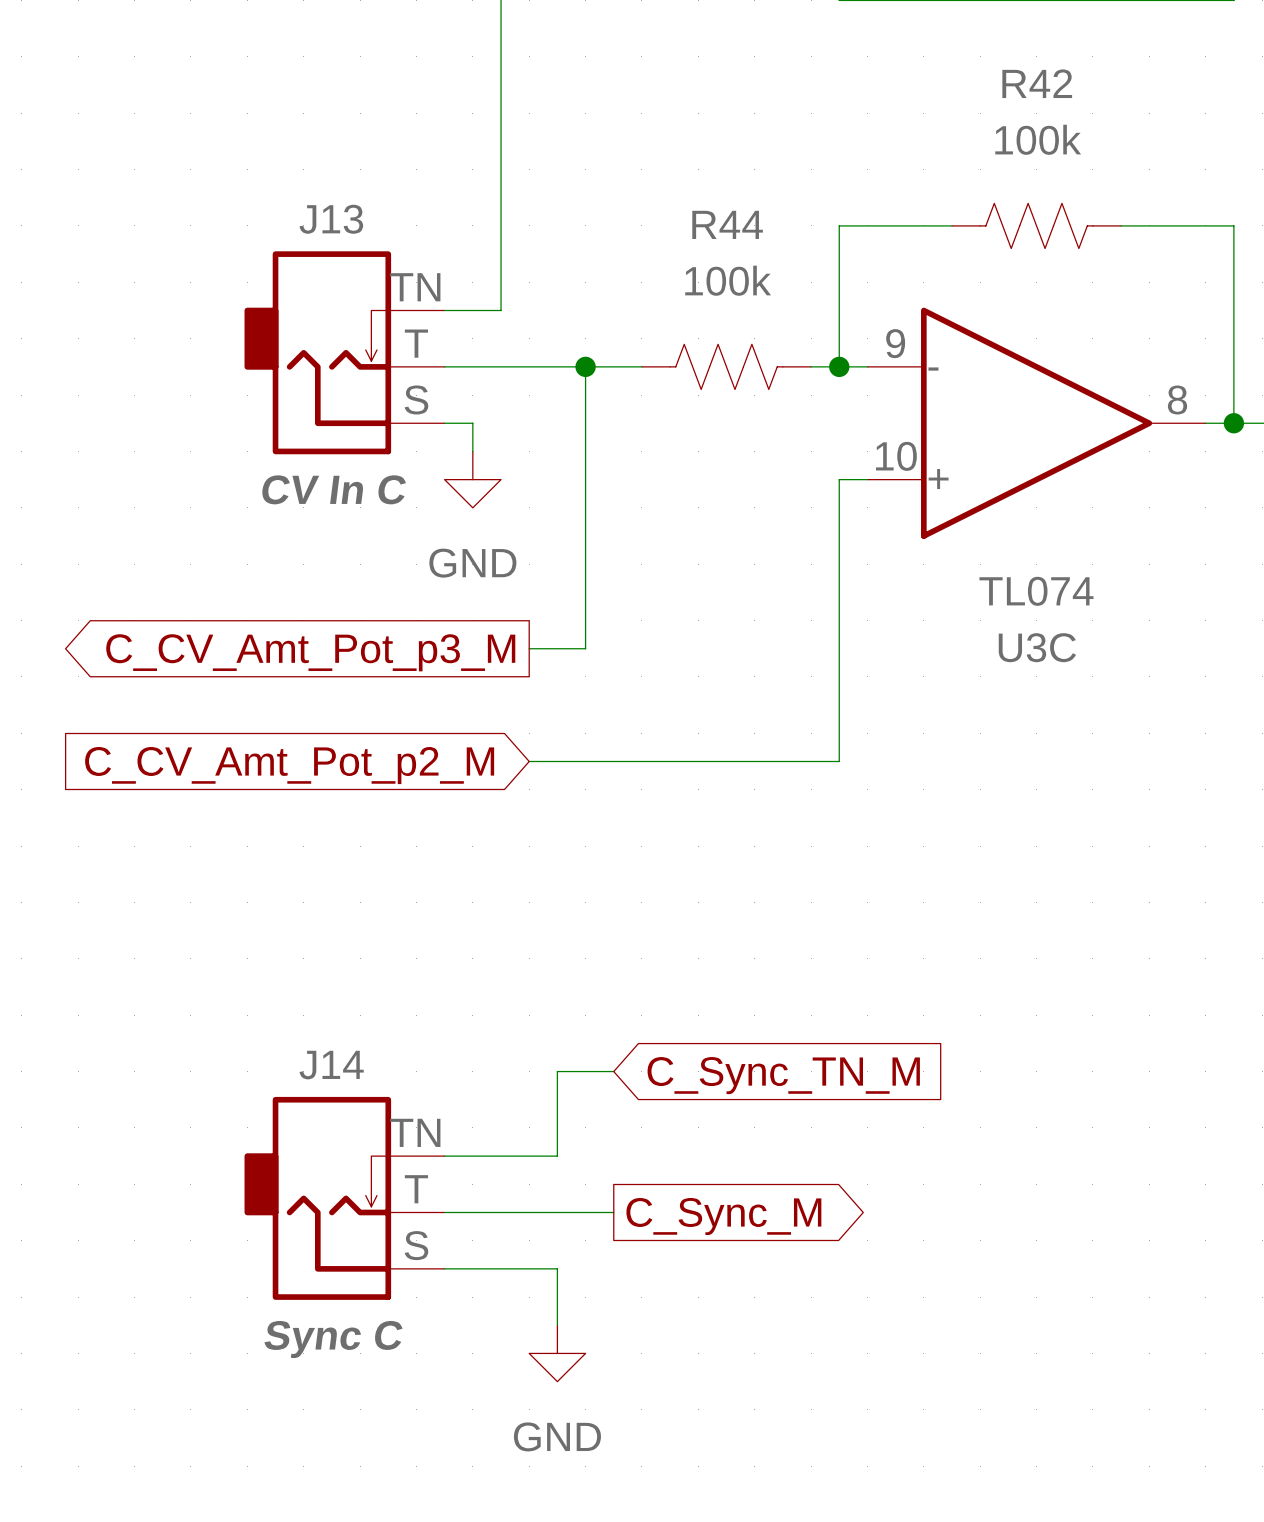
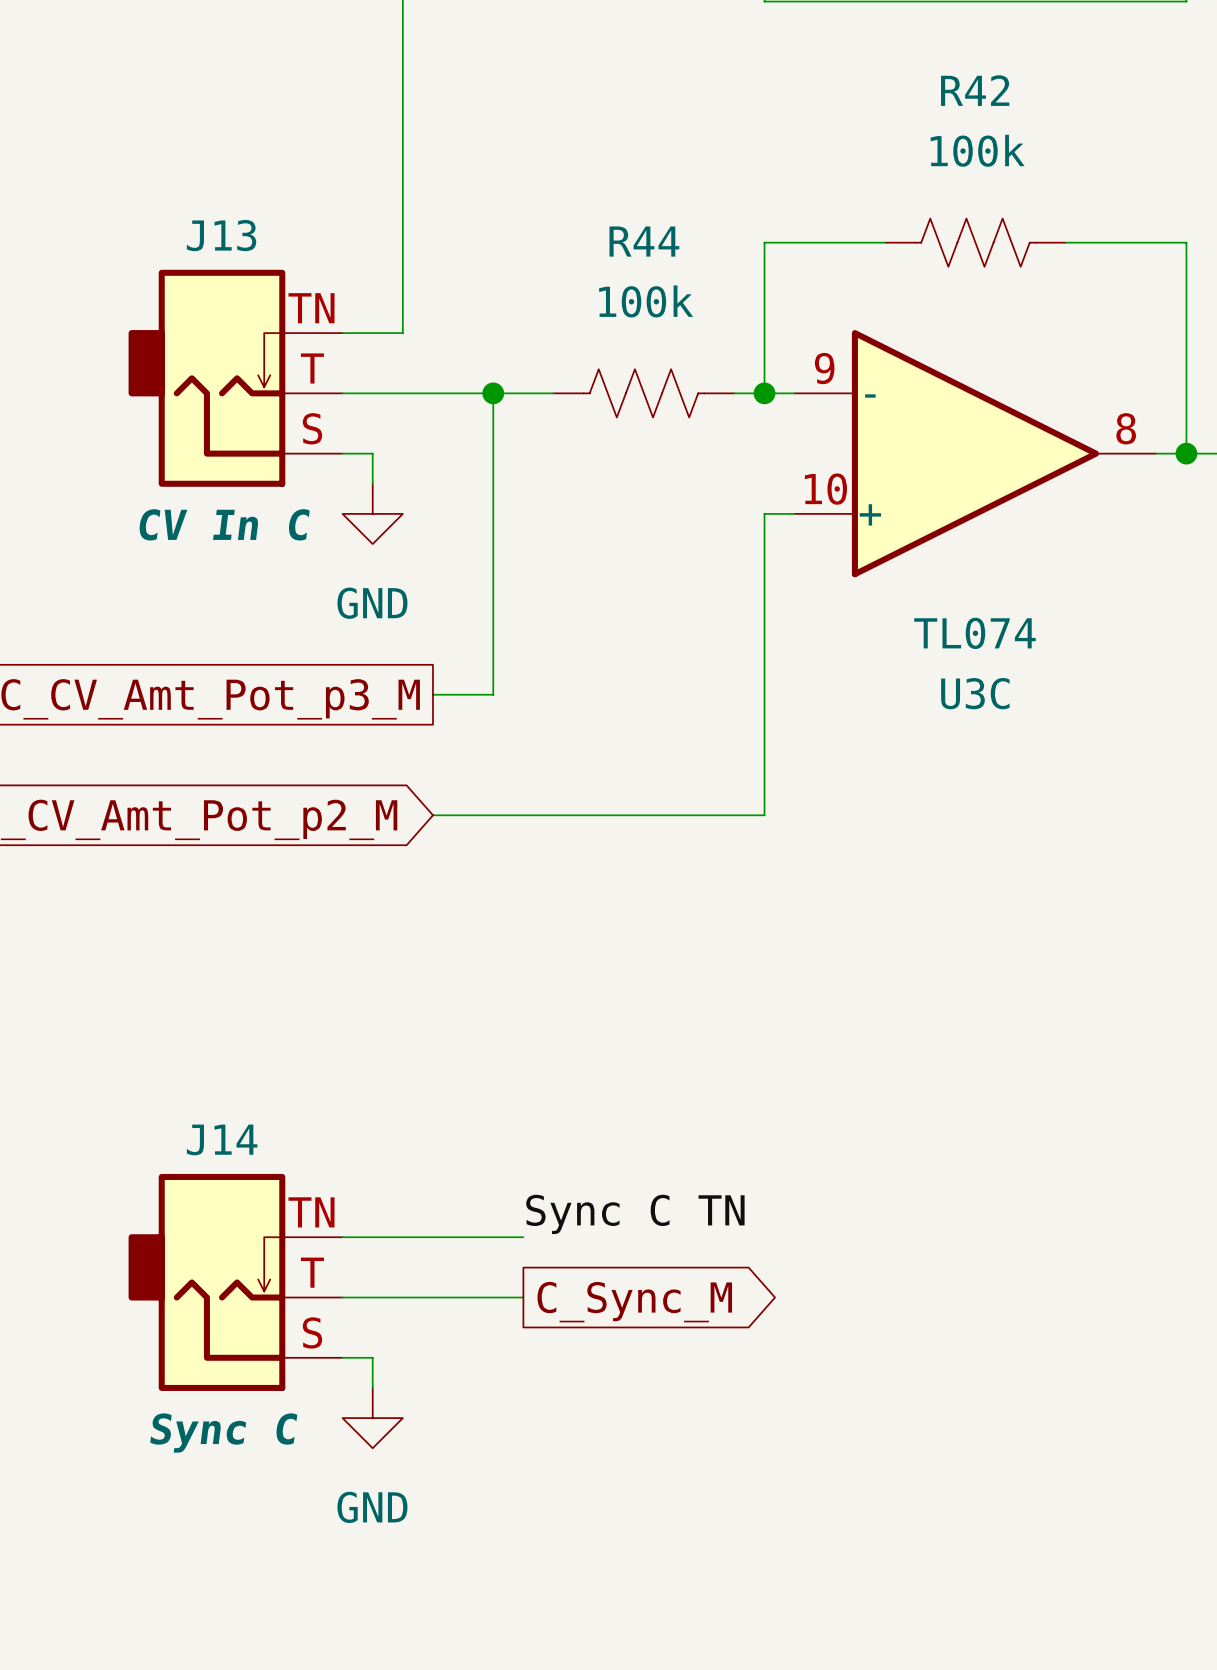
wire: (613, 1071) (557, 1071) (557, 1156) -> (523, 1237) (463, 1237)
global label: C_Sync_TN_M (783, 1075) -> none
label: none -> Sync C TN (635, 1214)
wire: (472, 1268) (557, 1268) (557, 1325) -> (372, 1357) (372, 1387)
power symbol position: GND (557, 1353) -> GND (372, 1418)

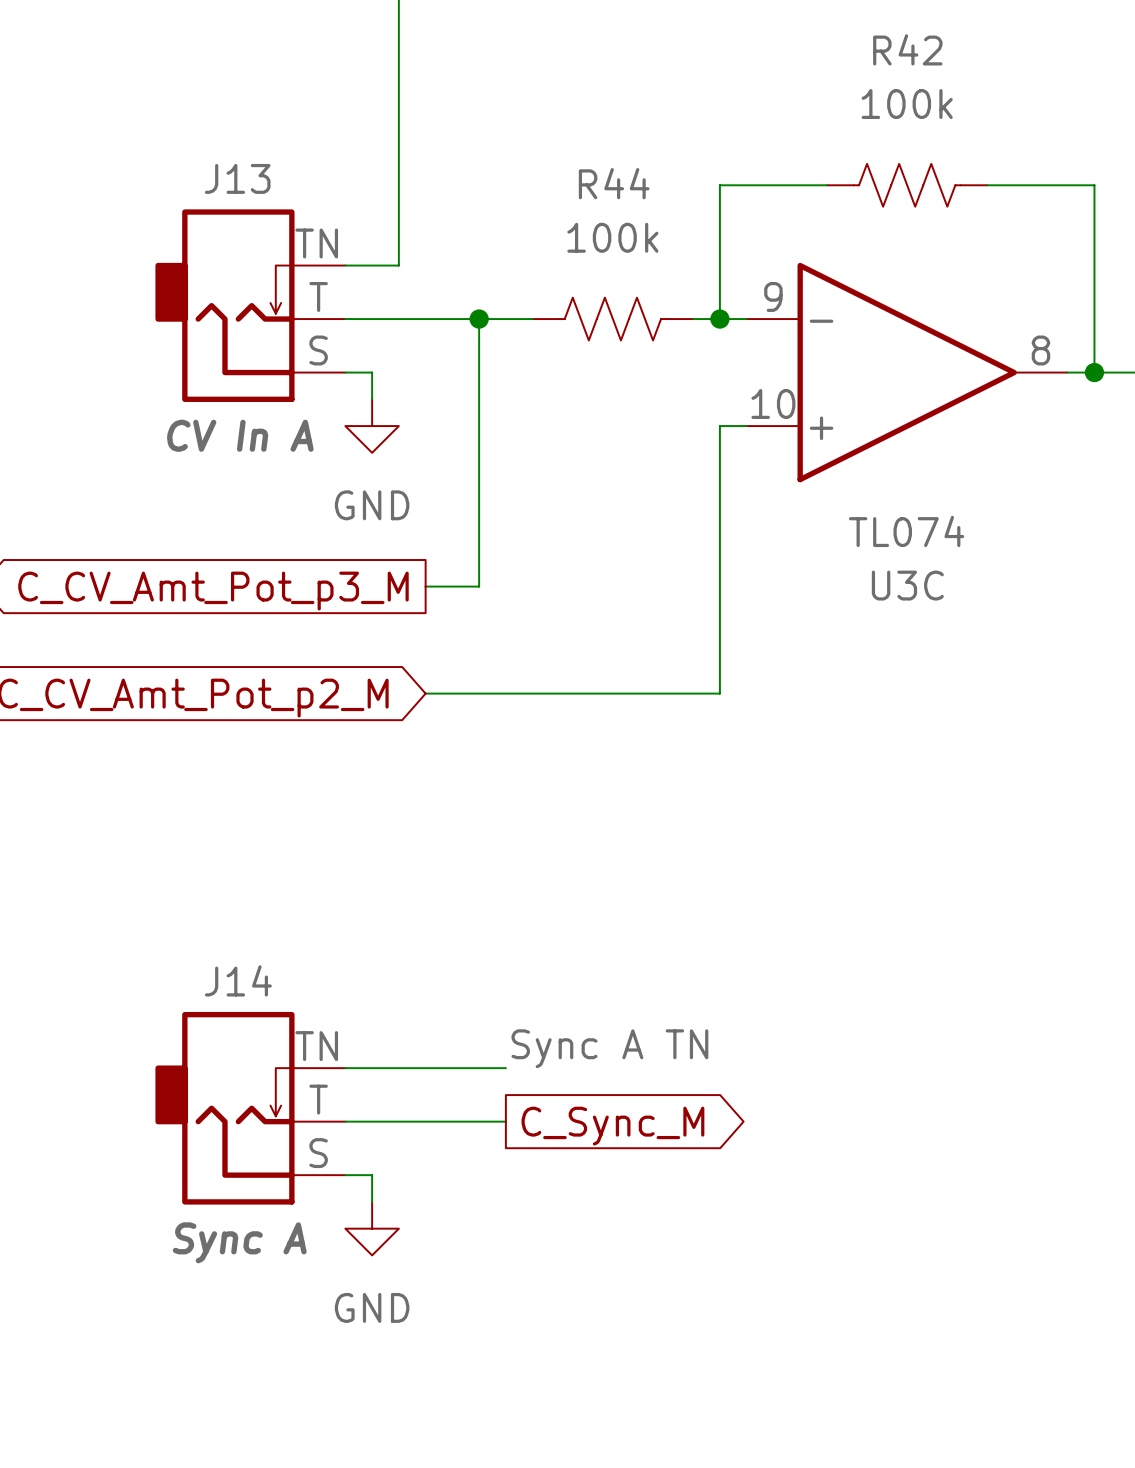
J13 text: CV In C (224, 524) -> CV In A (240, 435)
label: Sync C TN (635, 1214) -> Sync A TN (609, 1048)
J14 text: Sync C (223, 1433) -> Sync A (239, 1242)

